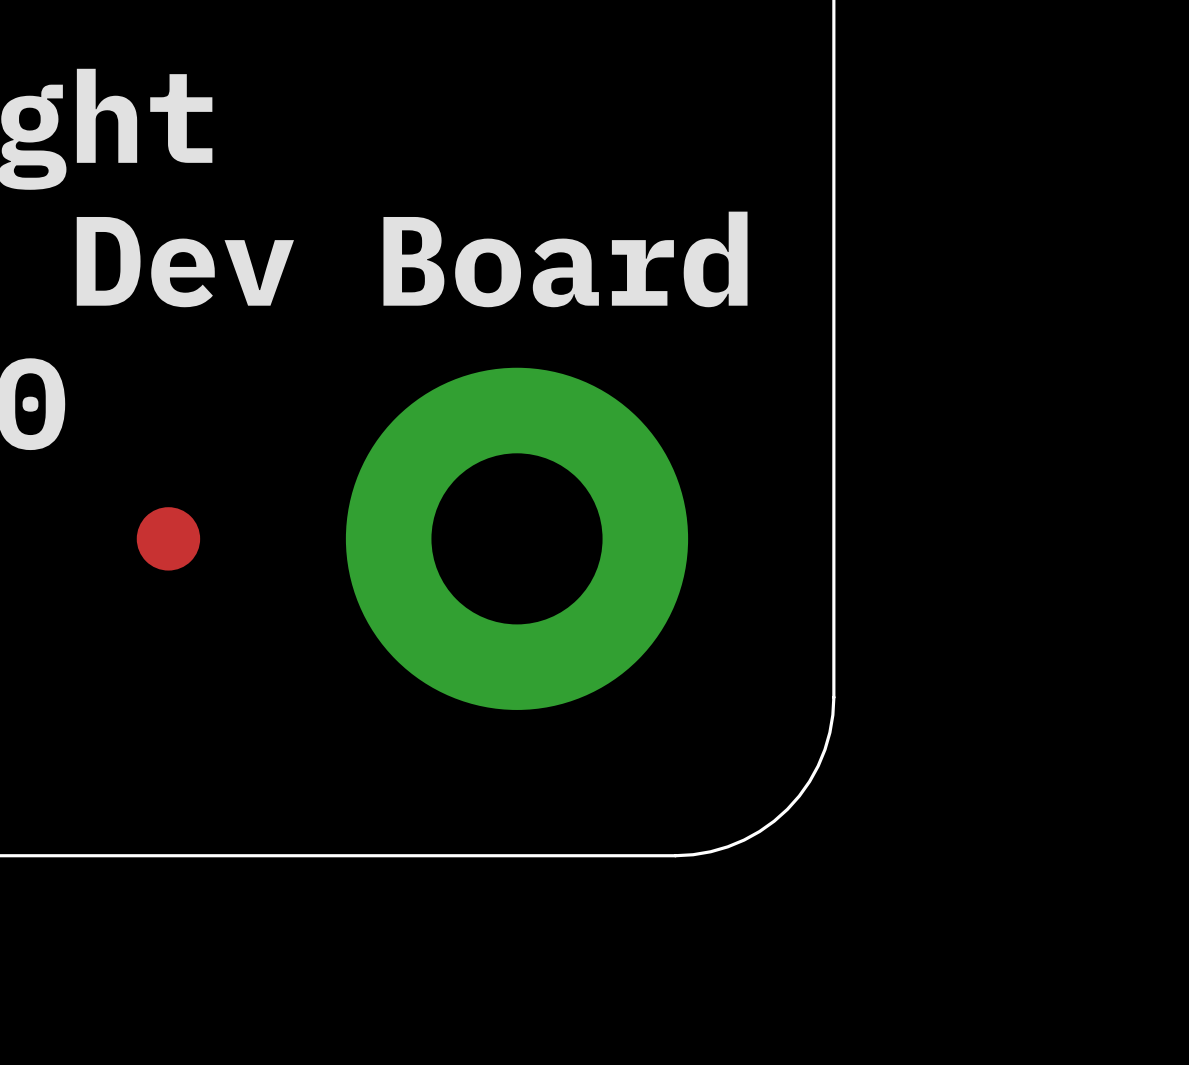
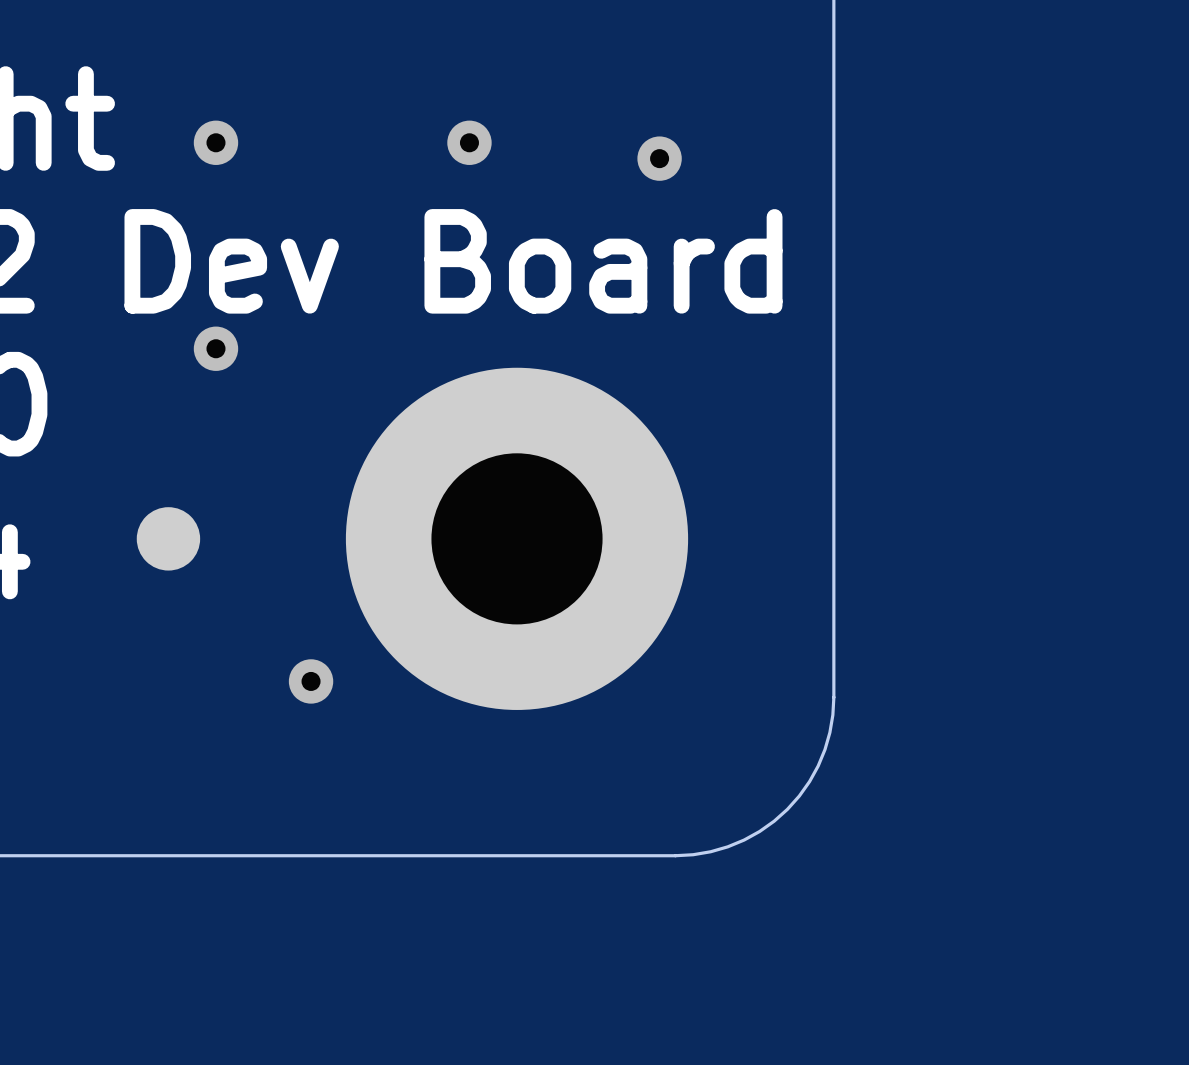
via: none -> (215, 142)
via: none -> (469, 142)
via: none -> (659, 158)
via: none -> (215, 348)
via: none -> (311, 681)

